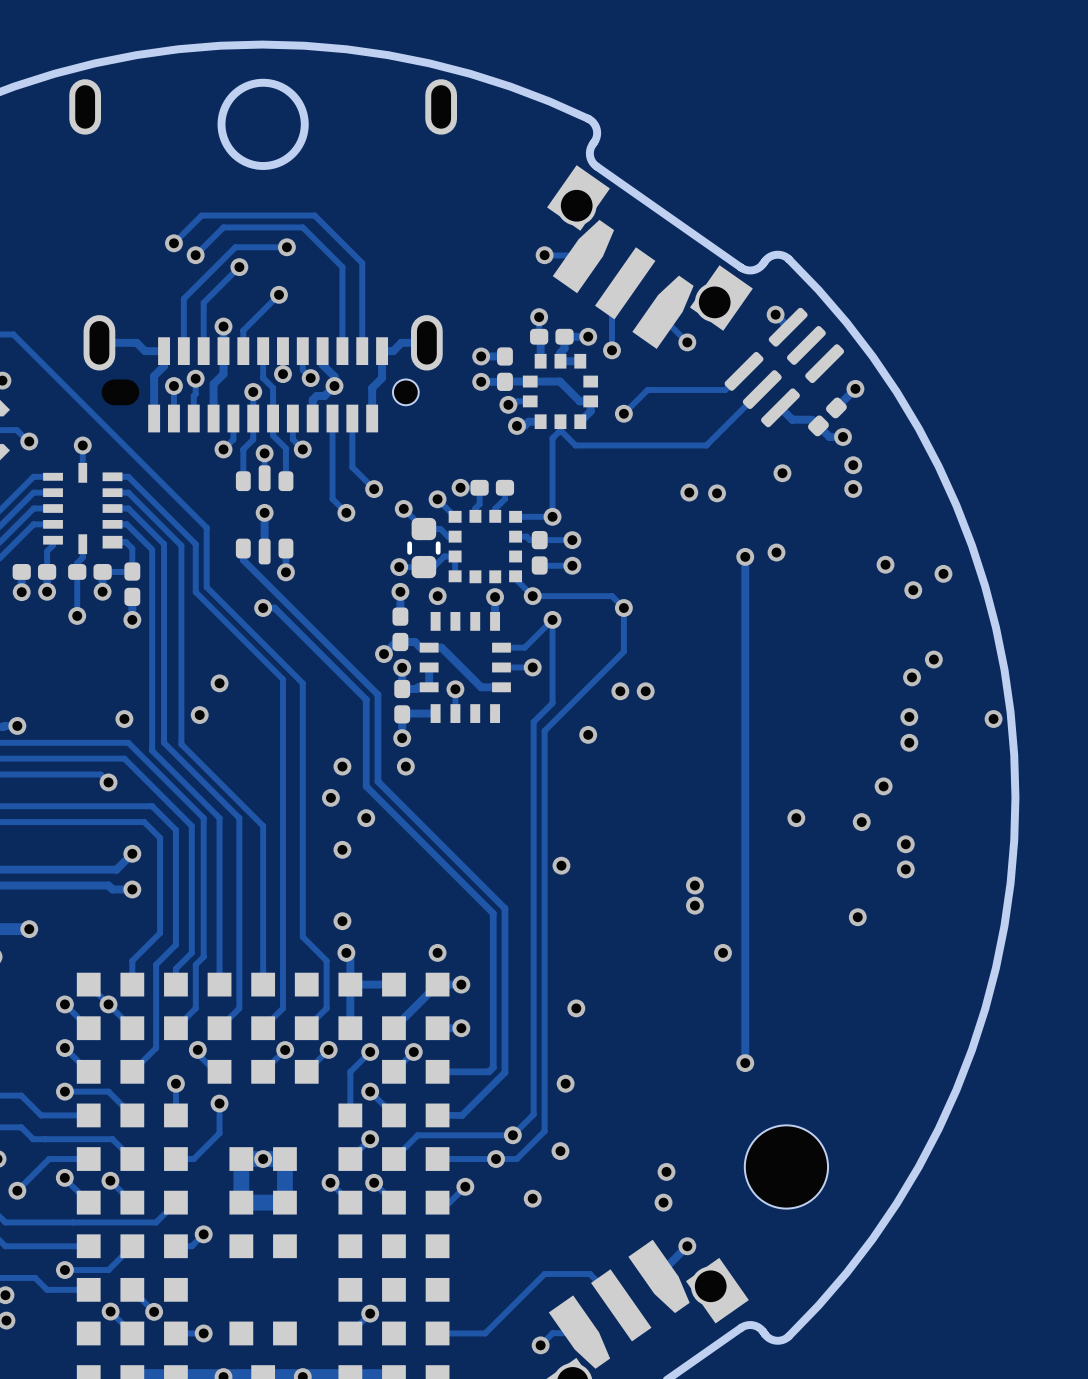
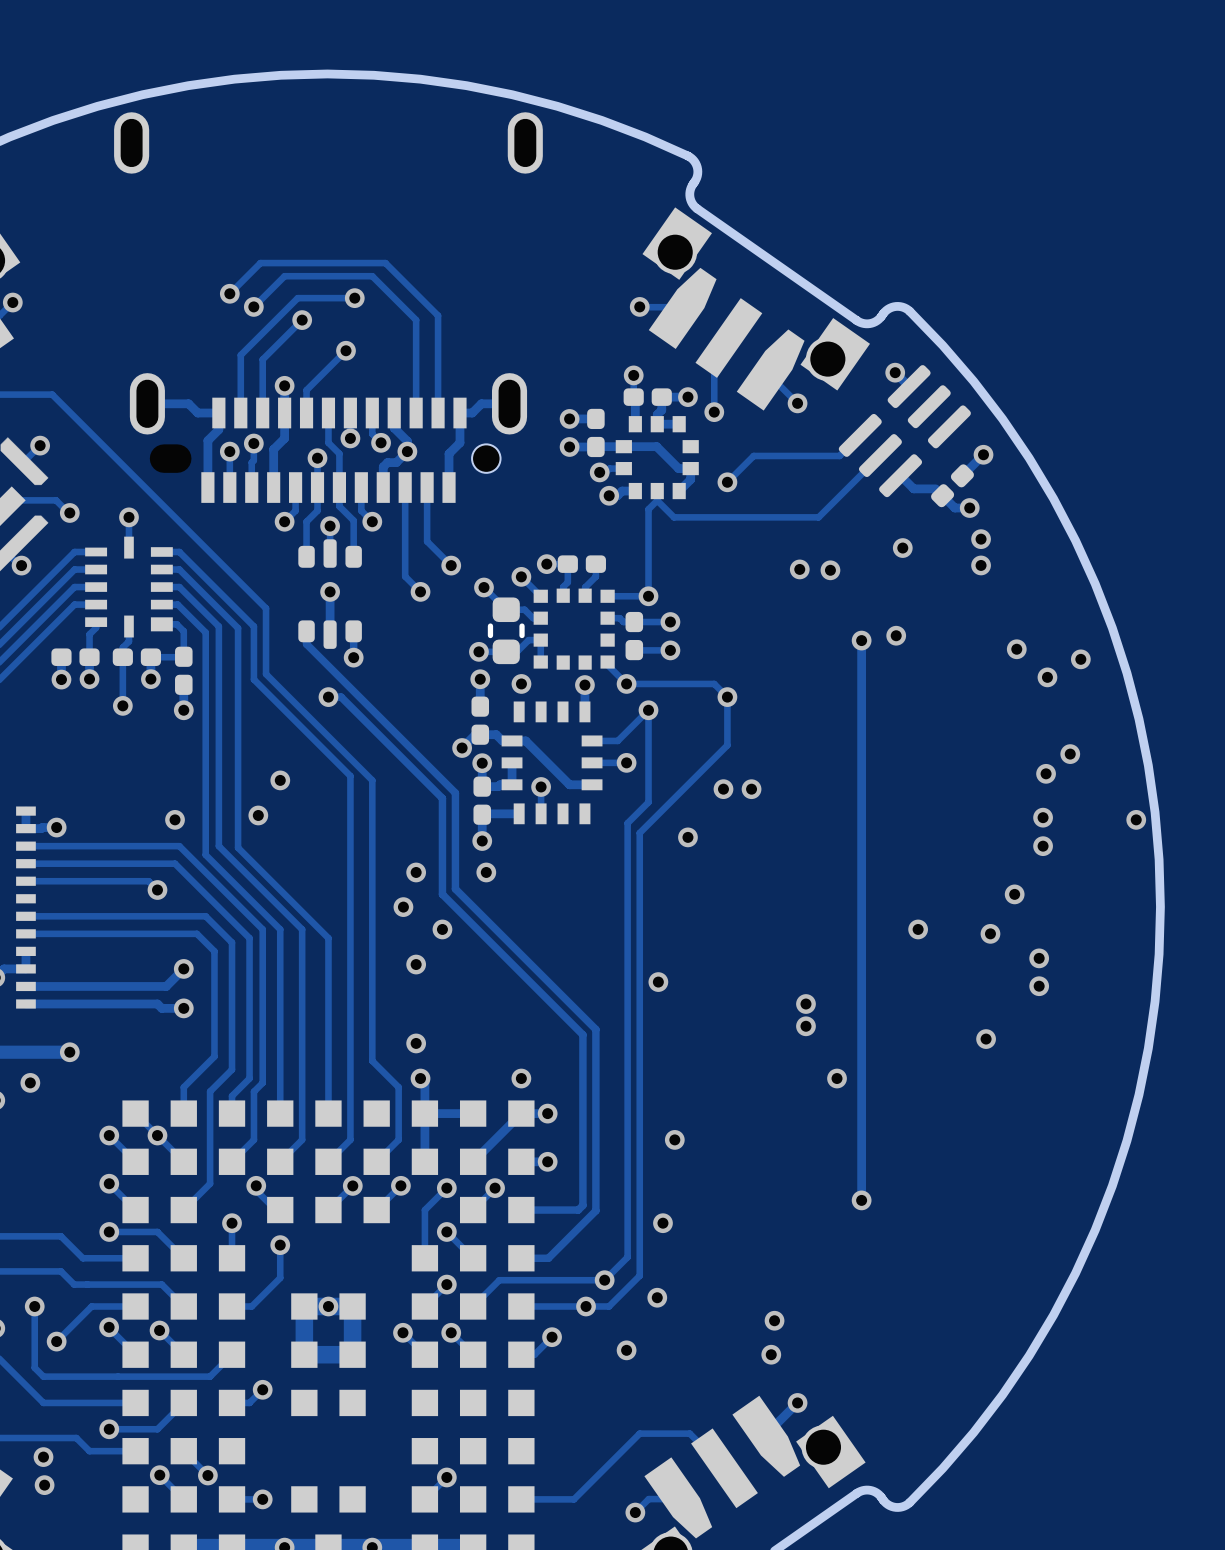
round board edge: [217, 78, 309, 170] -> none
part: (786, 1166) -> none

